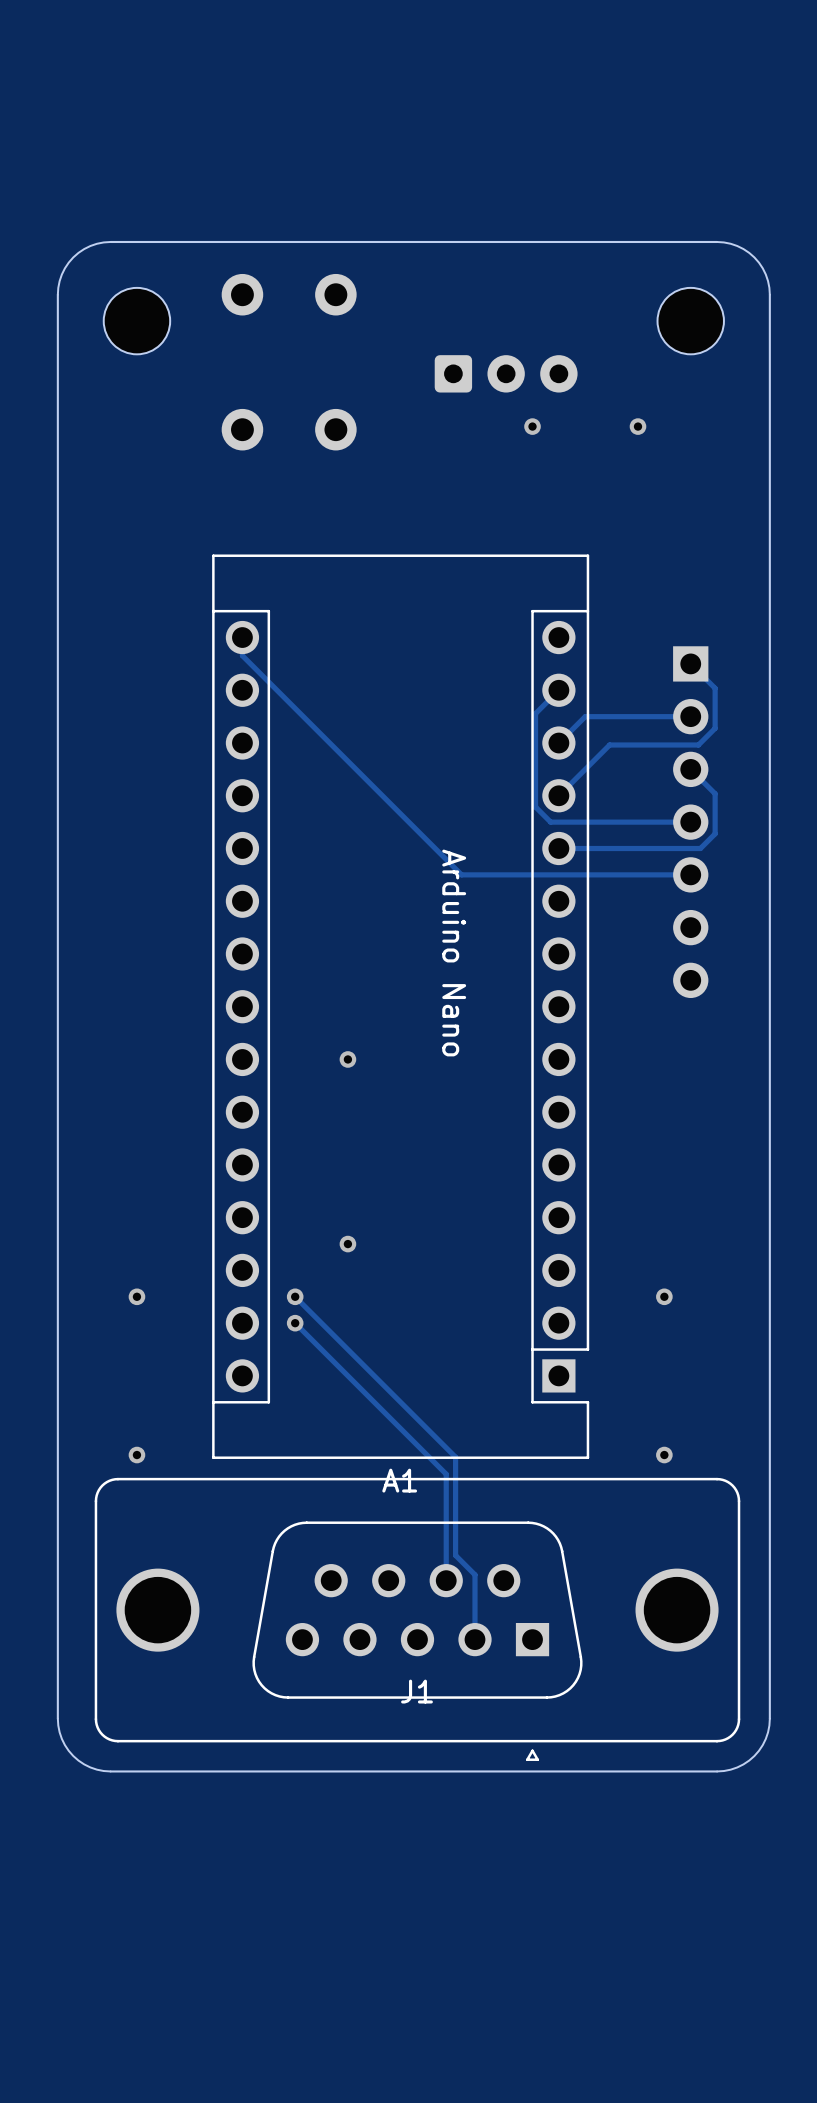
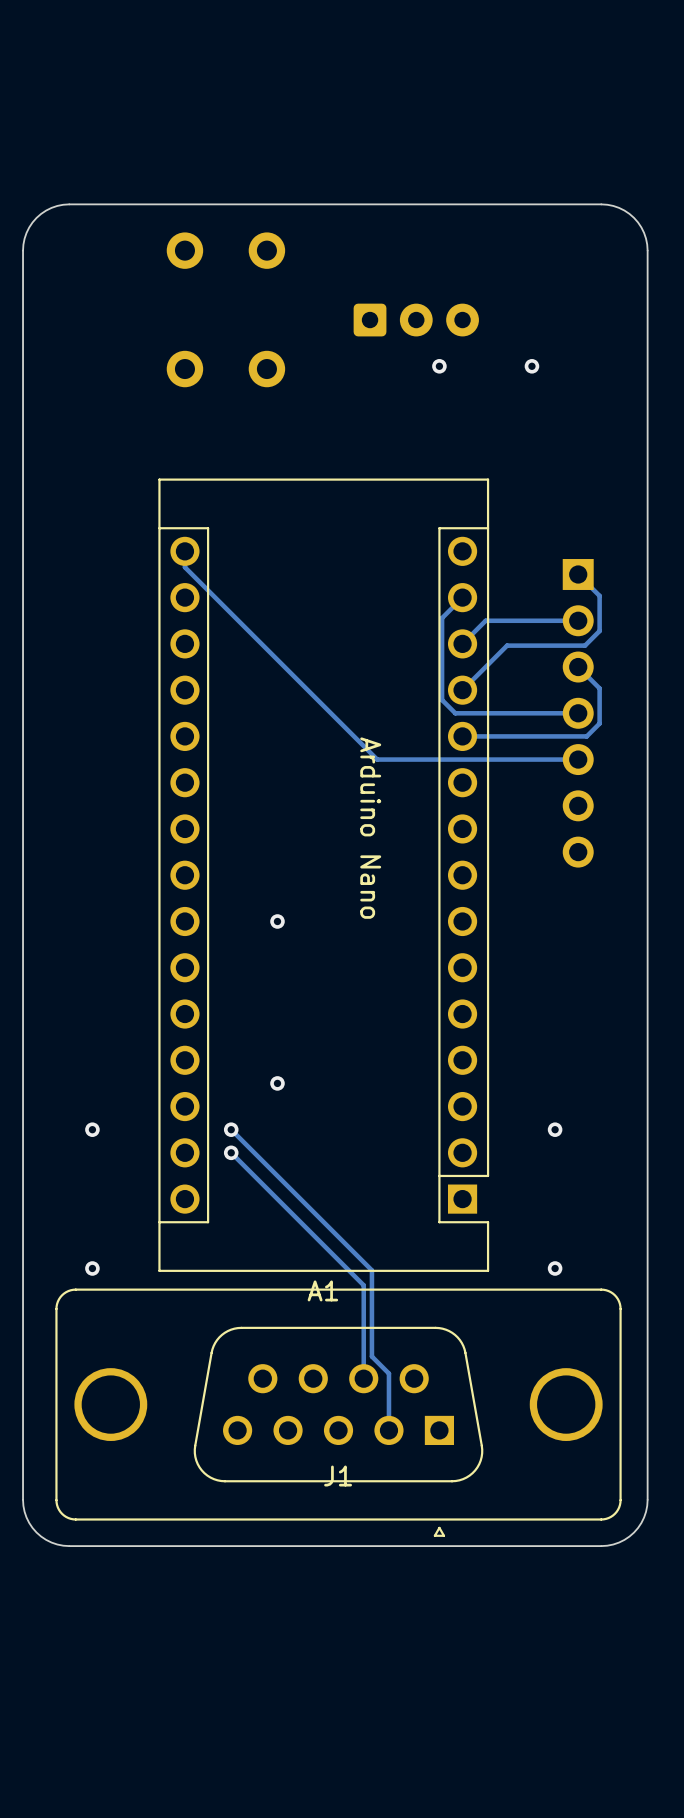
part: (136, 321) -> none
part: (690, 321) -> none

